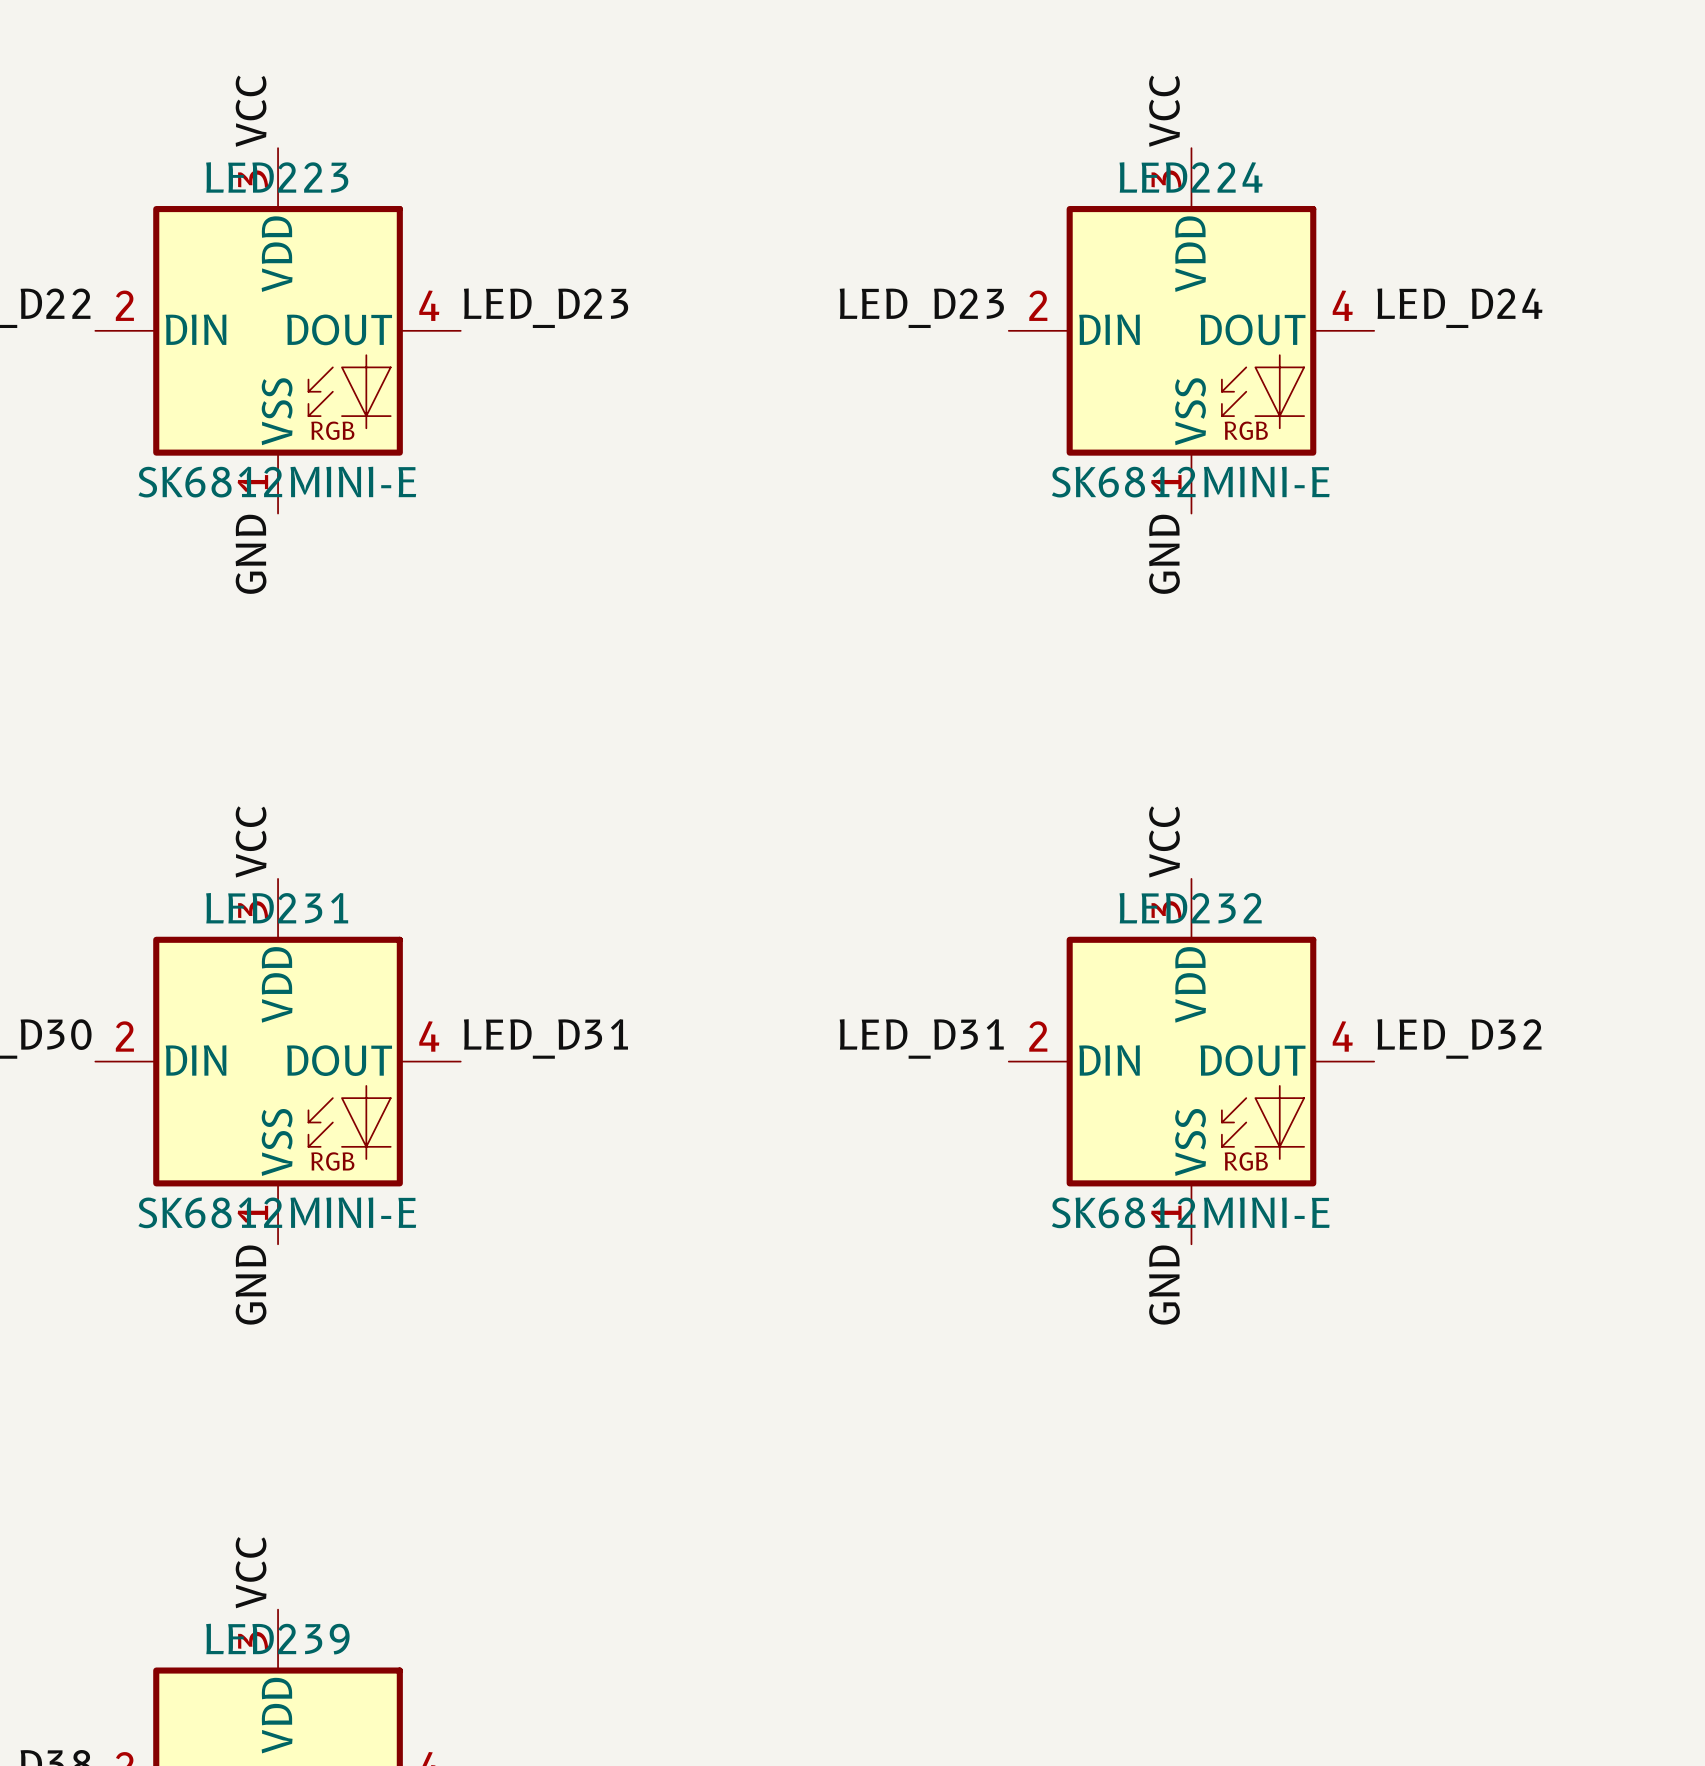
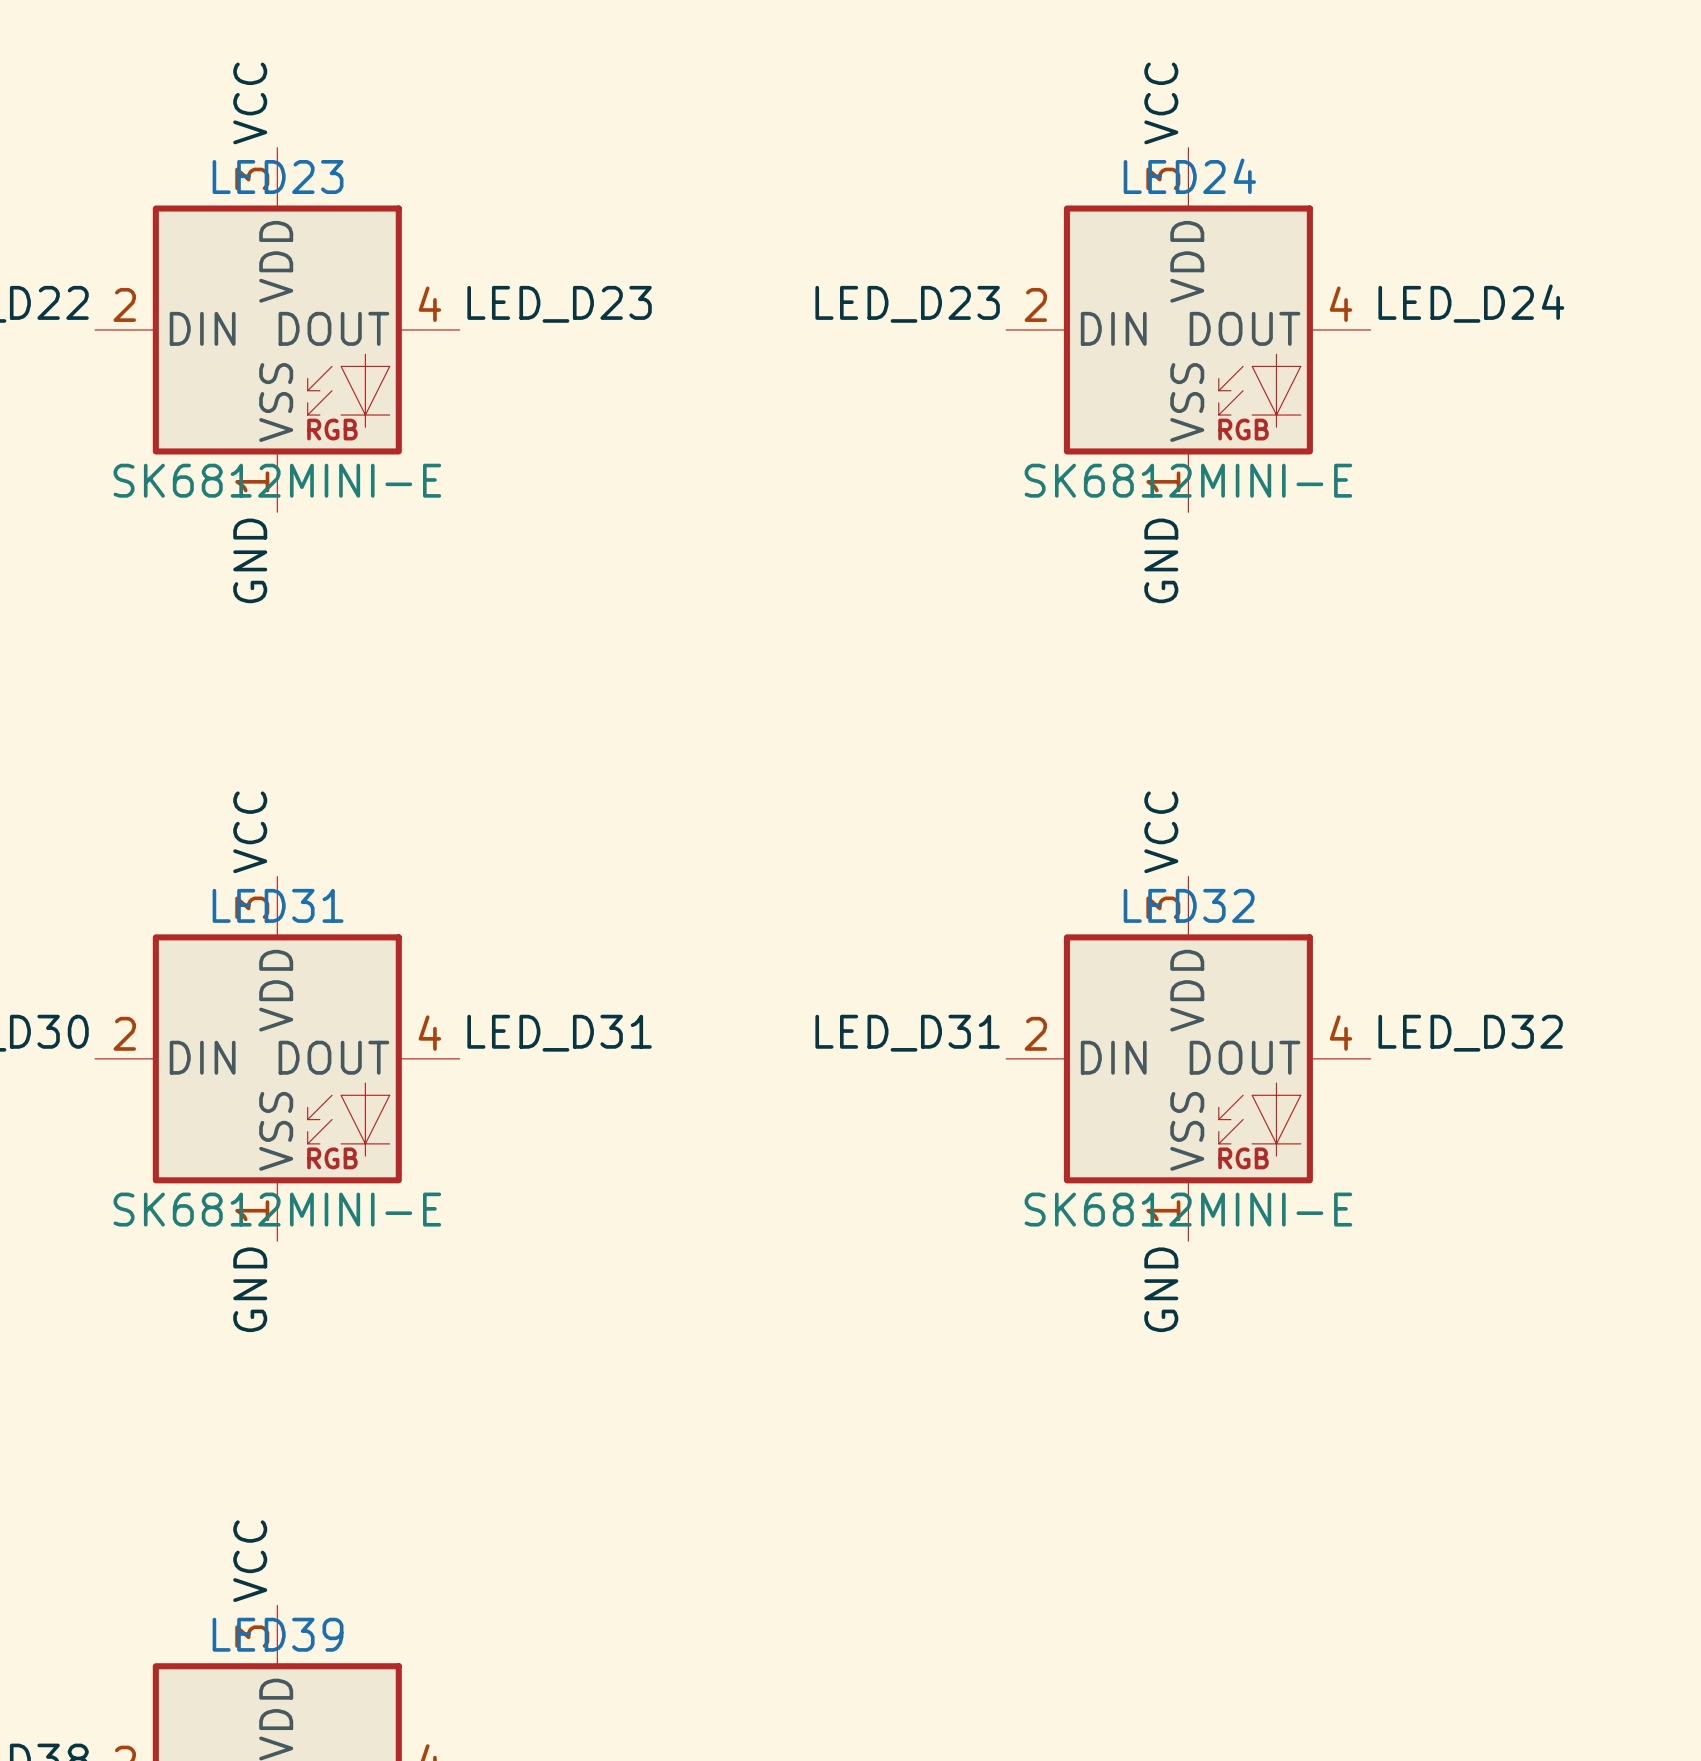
LED223 name: LED223 (277, 177) -> LED23 (278, 177)
LED224 name: LED224 (1191, 177) -> LED24 (1189, 176)
LED231 name: LED231 (277, 908) -> LED31 (278, 905)
LED232 name: LED232 (1190, 908) -> LED32 (1189, 905)
LED239 name: LED239 (277, 1639) -> LED39 (278, 1634)

